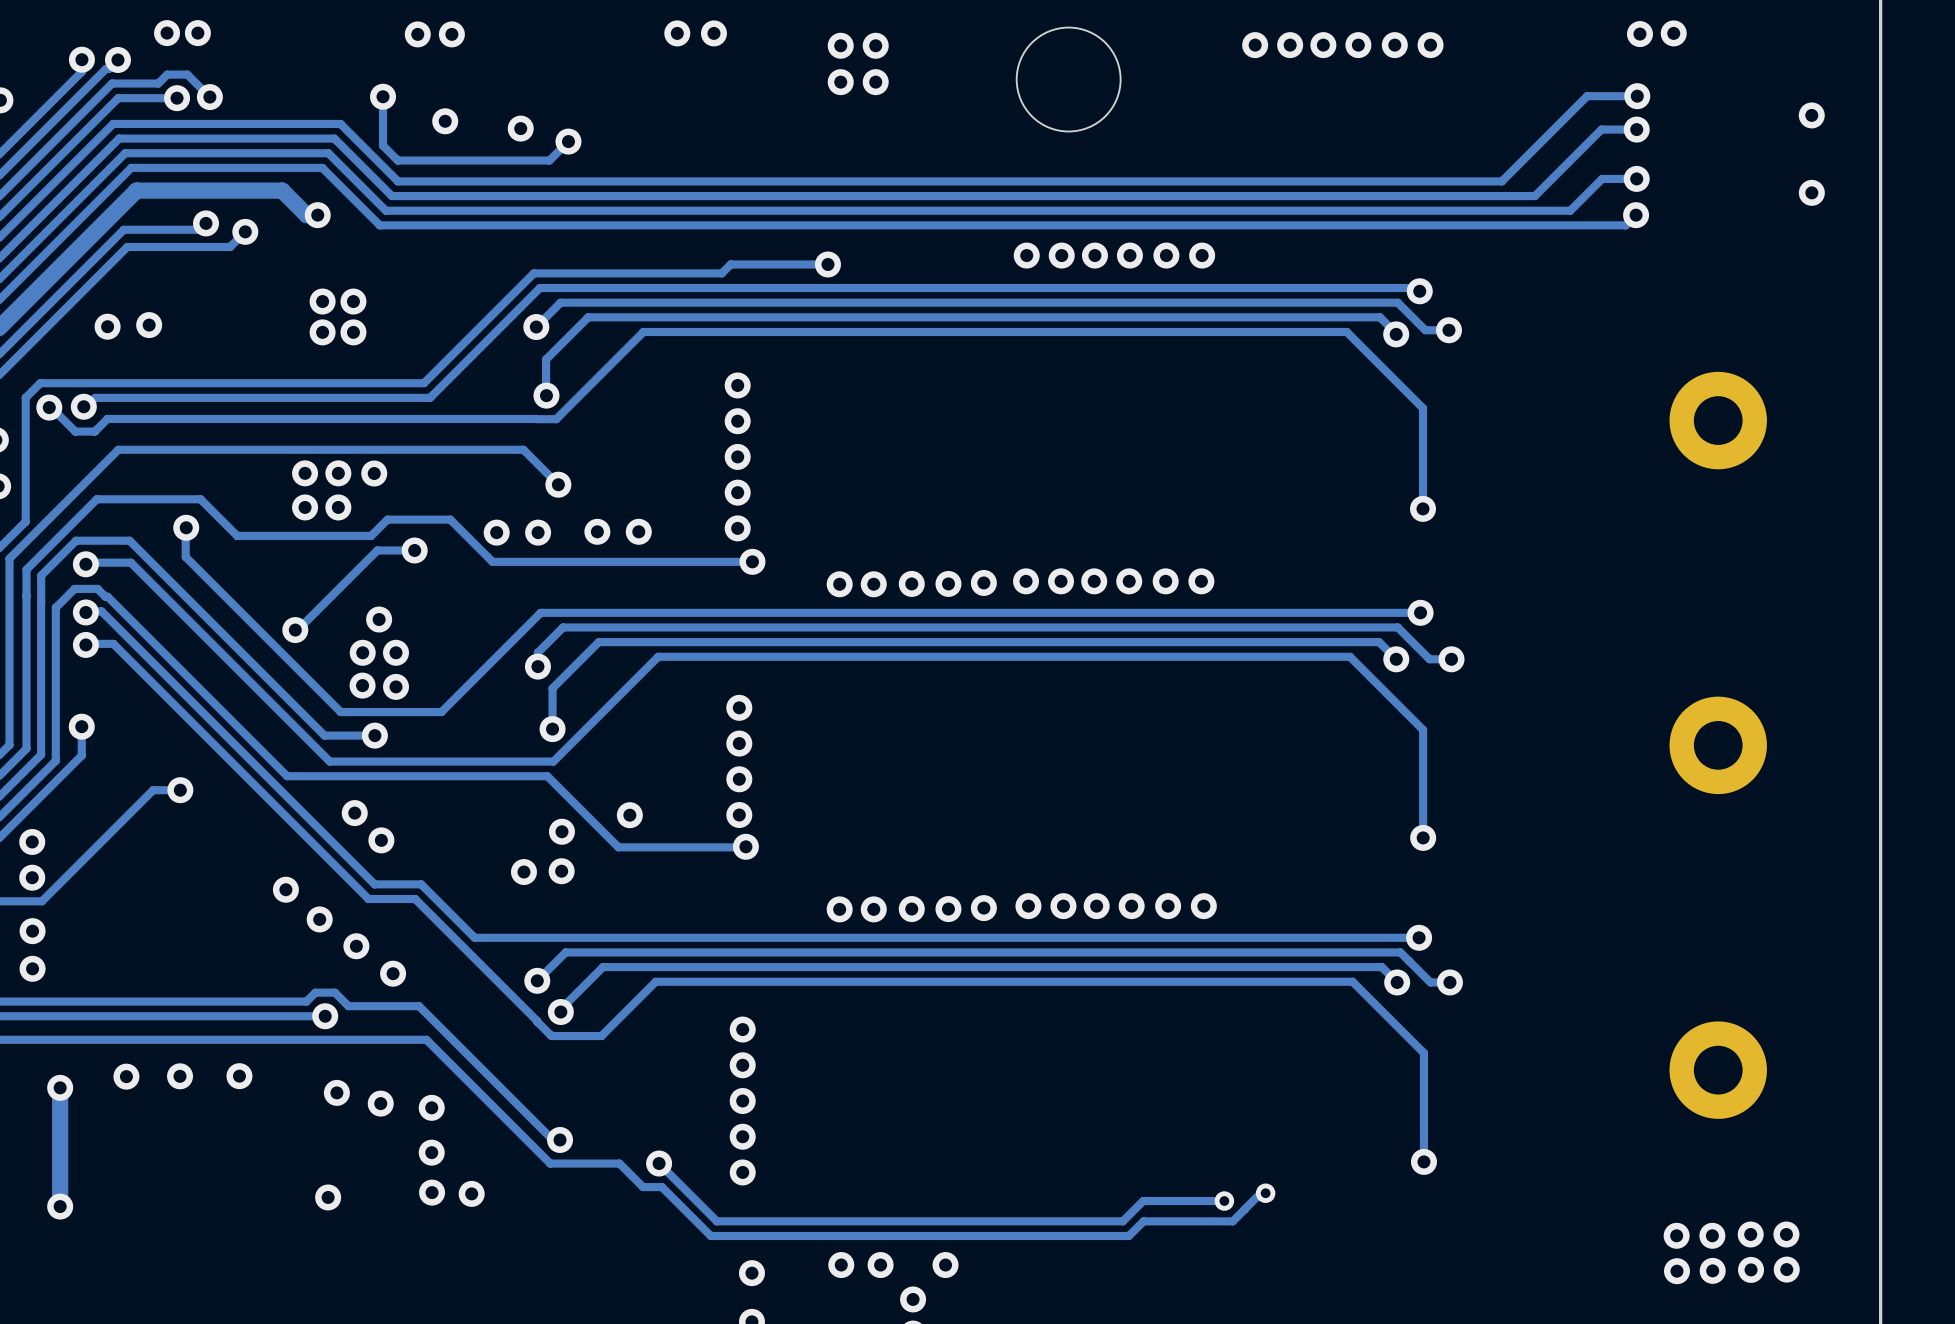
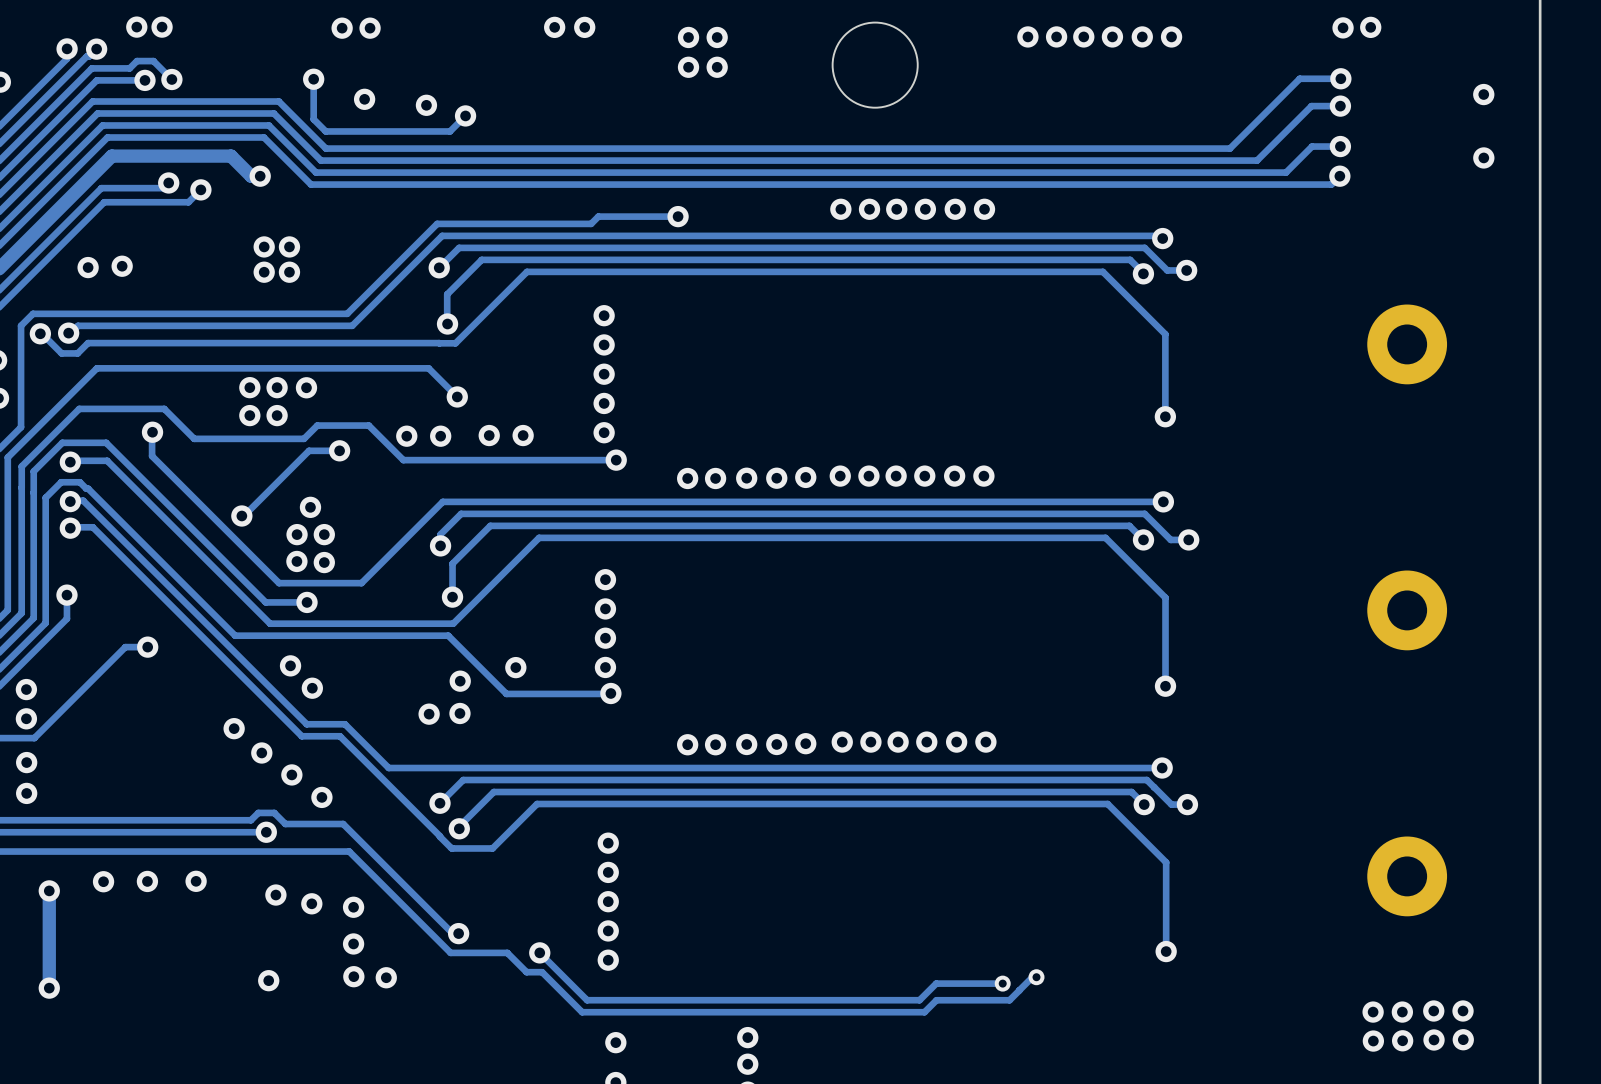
via: (841, 1265) -> none
via: (880, 1265) -> none
via: (945, 1265) -> none
via: none -> (747, 1037)

